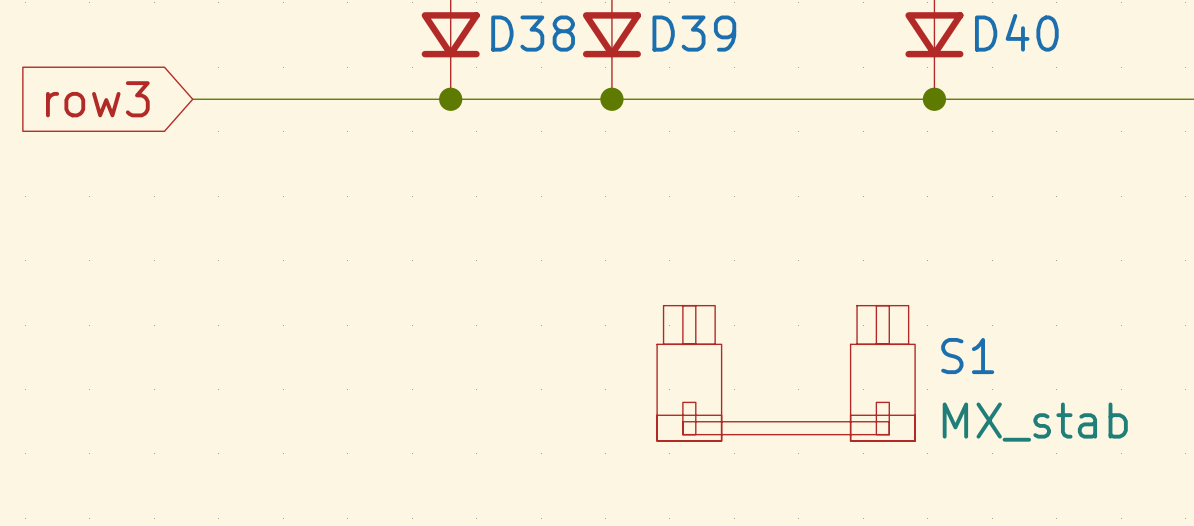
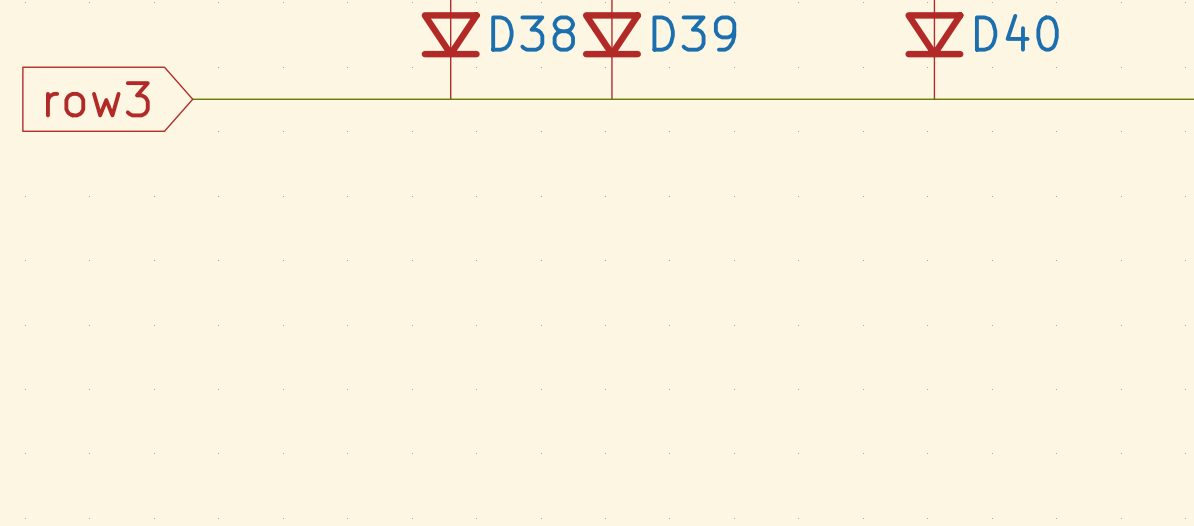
junction: (450, 99) -> none
junction: (611, 99) -> none
junction: (934, 99) -> none
S1: MX_stab (786, 373) -> none

